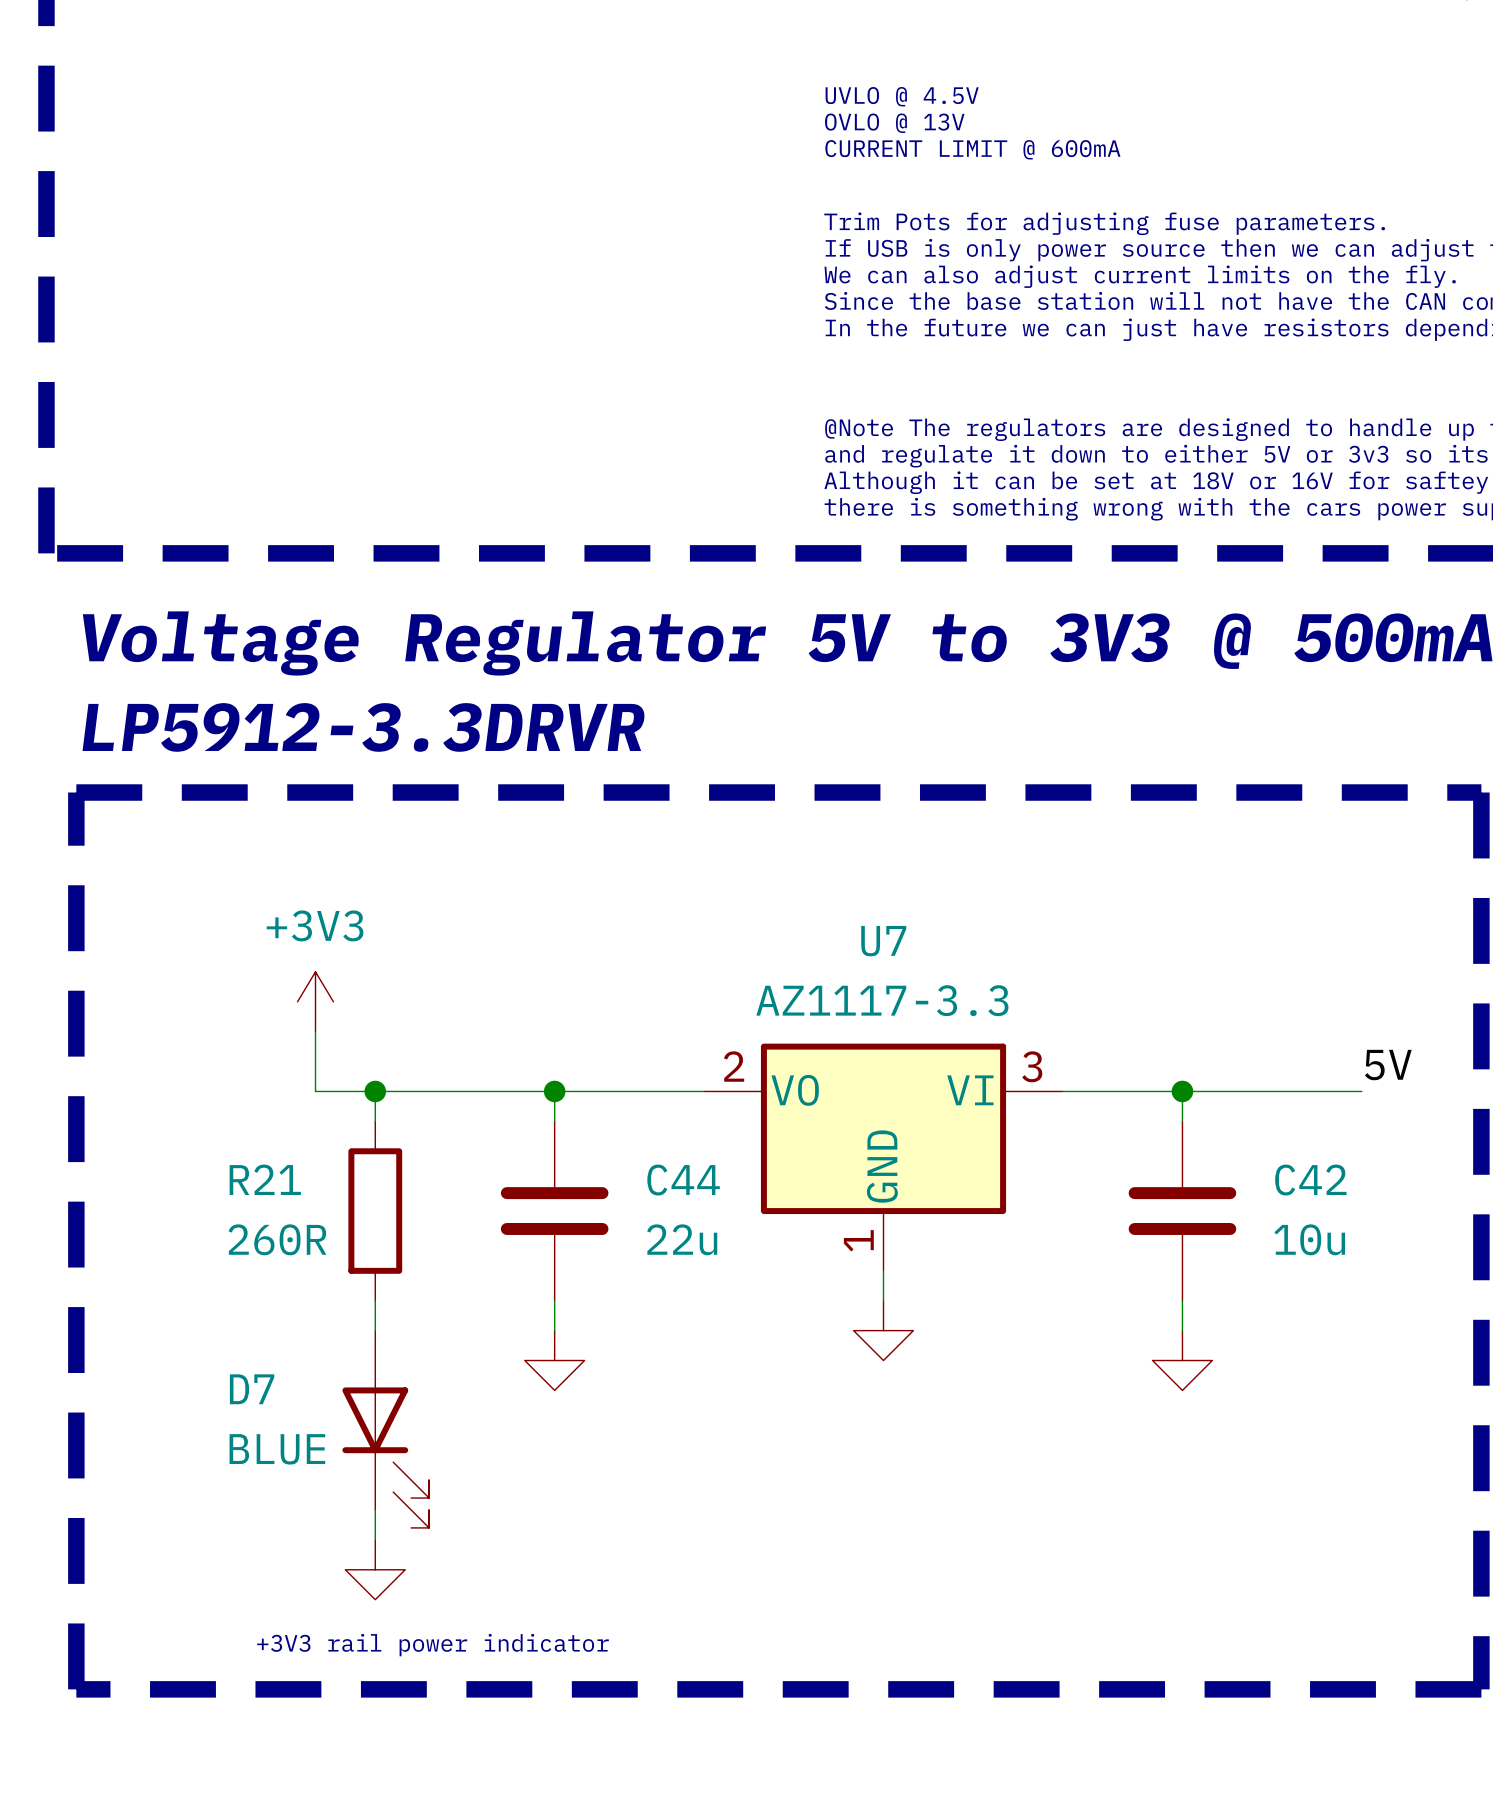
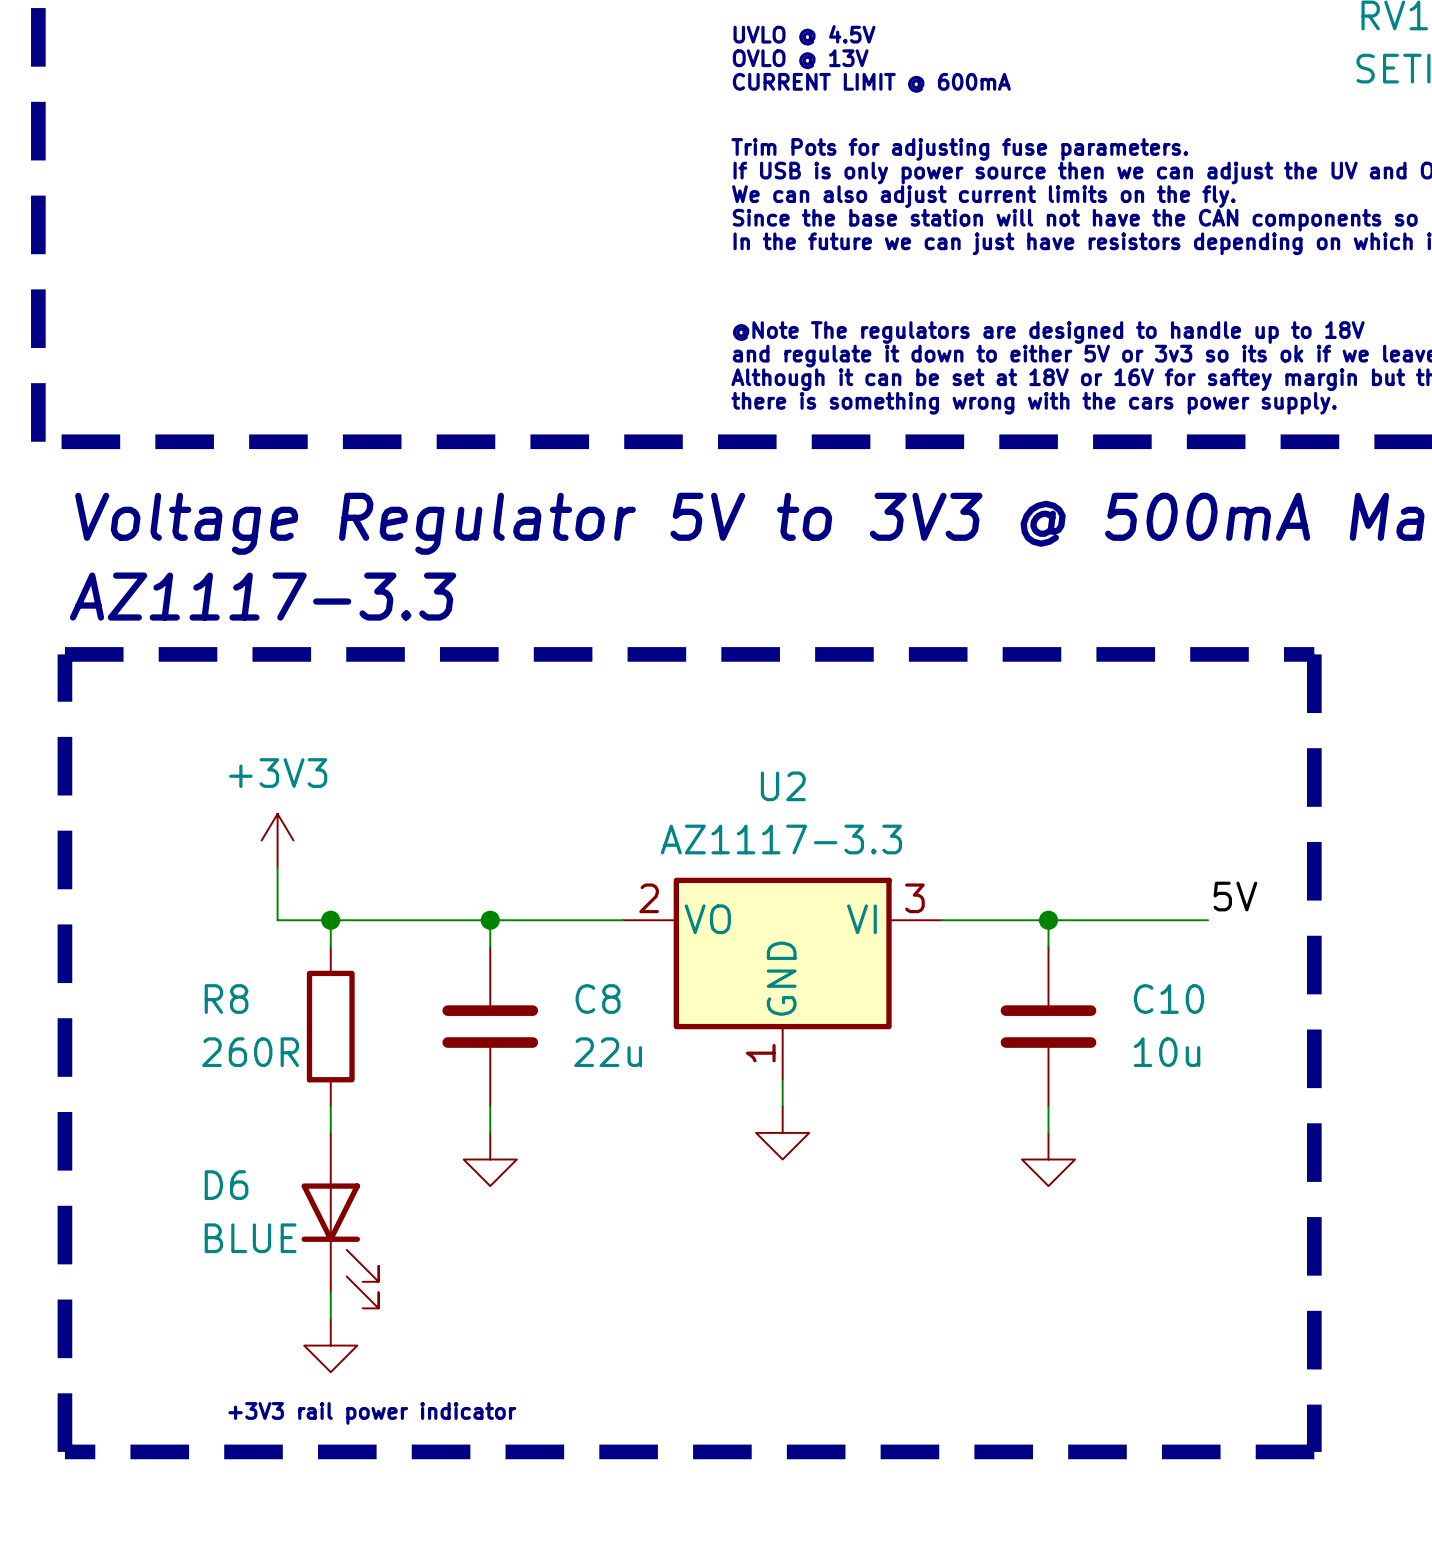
text: LP5912-3.3DRVR (363, 727) -> AZ1117-3.3 (263, 596)
U7 name: U7 (883, 941) -> U2 (783, 786)
R21 name: R21 (265, 1179) -> R8 (226, 999)
C44 name: C44 (683, 1180) -> C8 (598, 999)
C42 name: C42 (1310, 1180) -> C10 (1168, 999)
D7 name: D7 (252, 1389) -> D6 (226, 1185)

